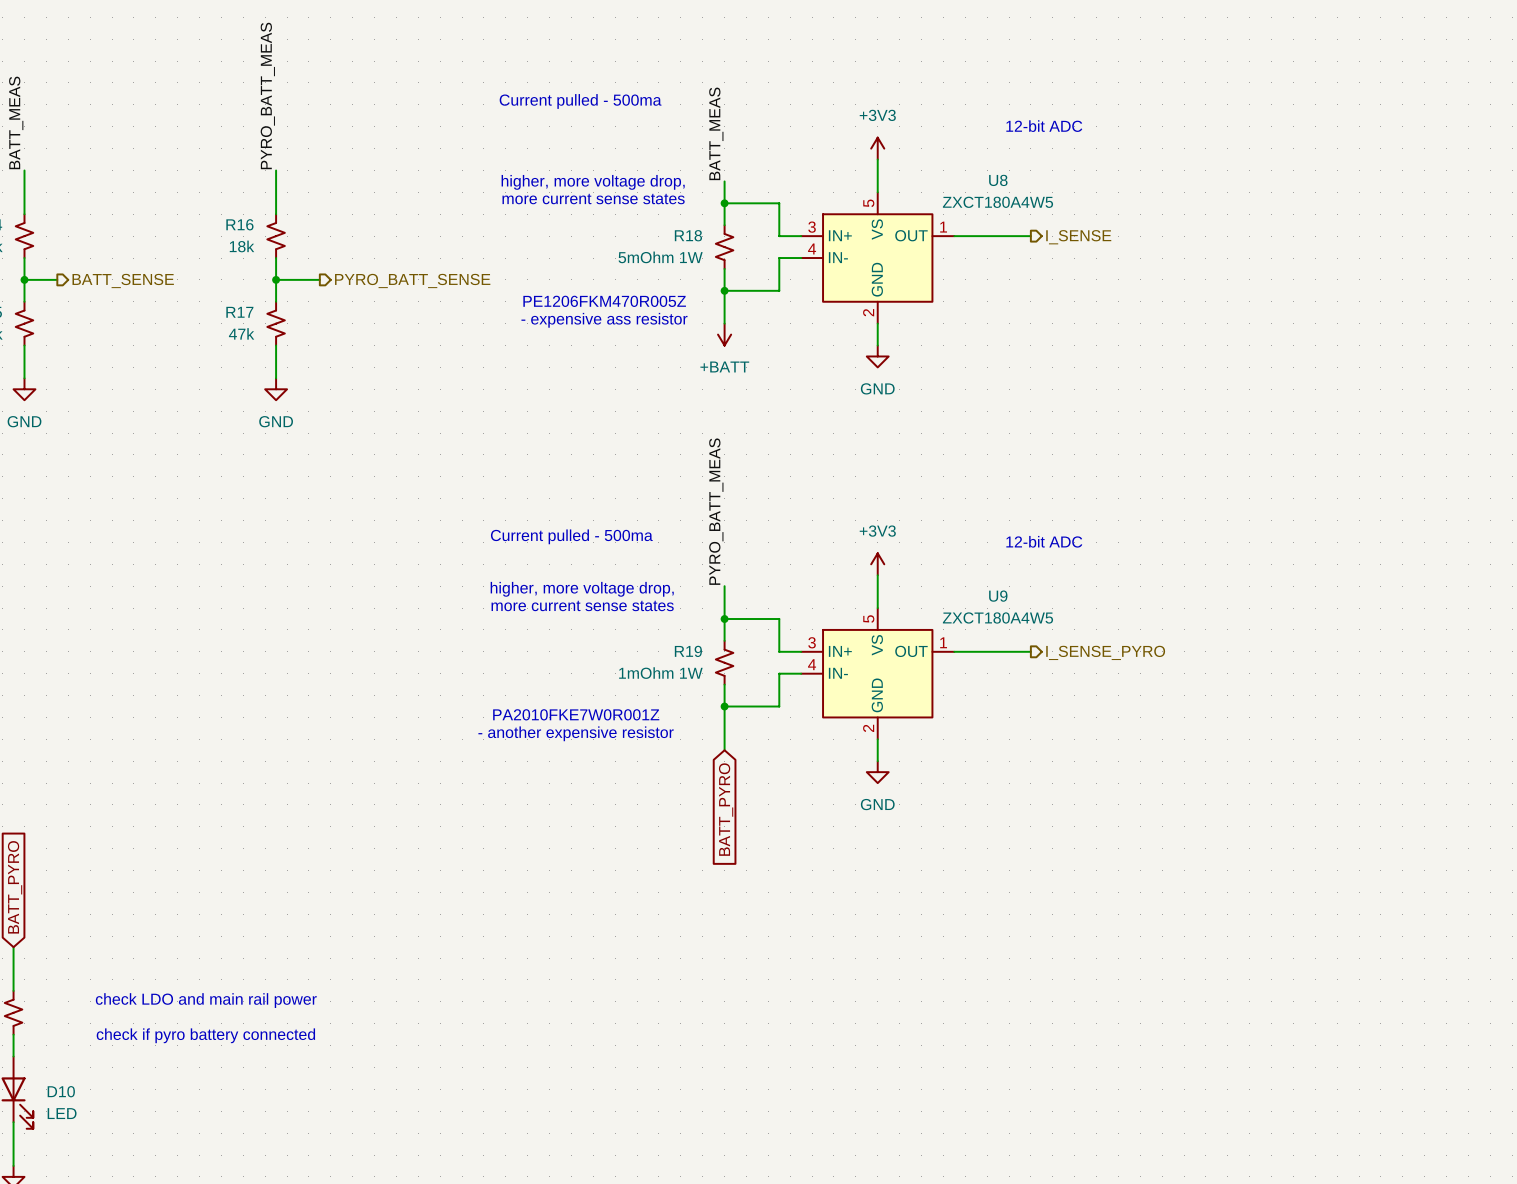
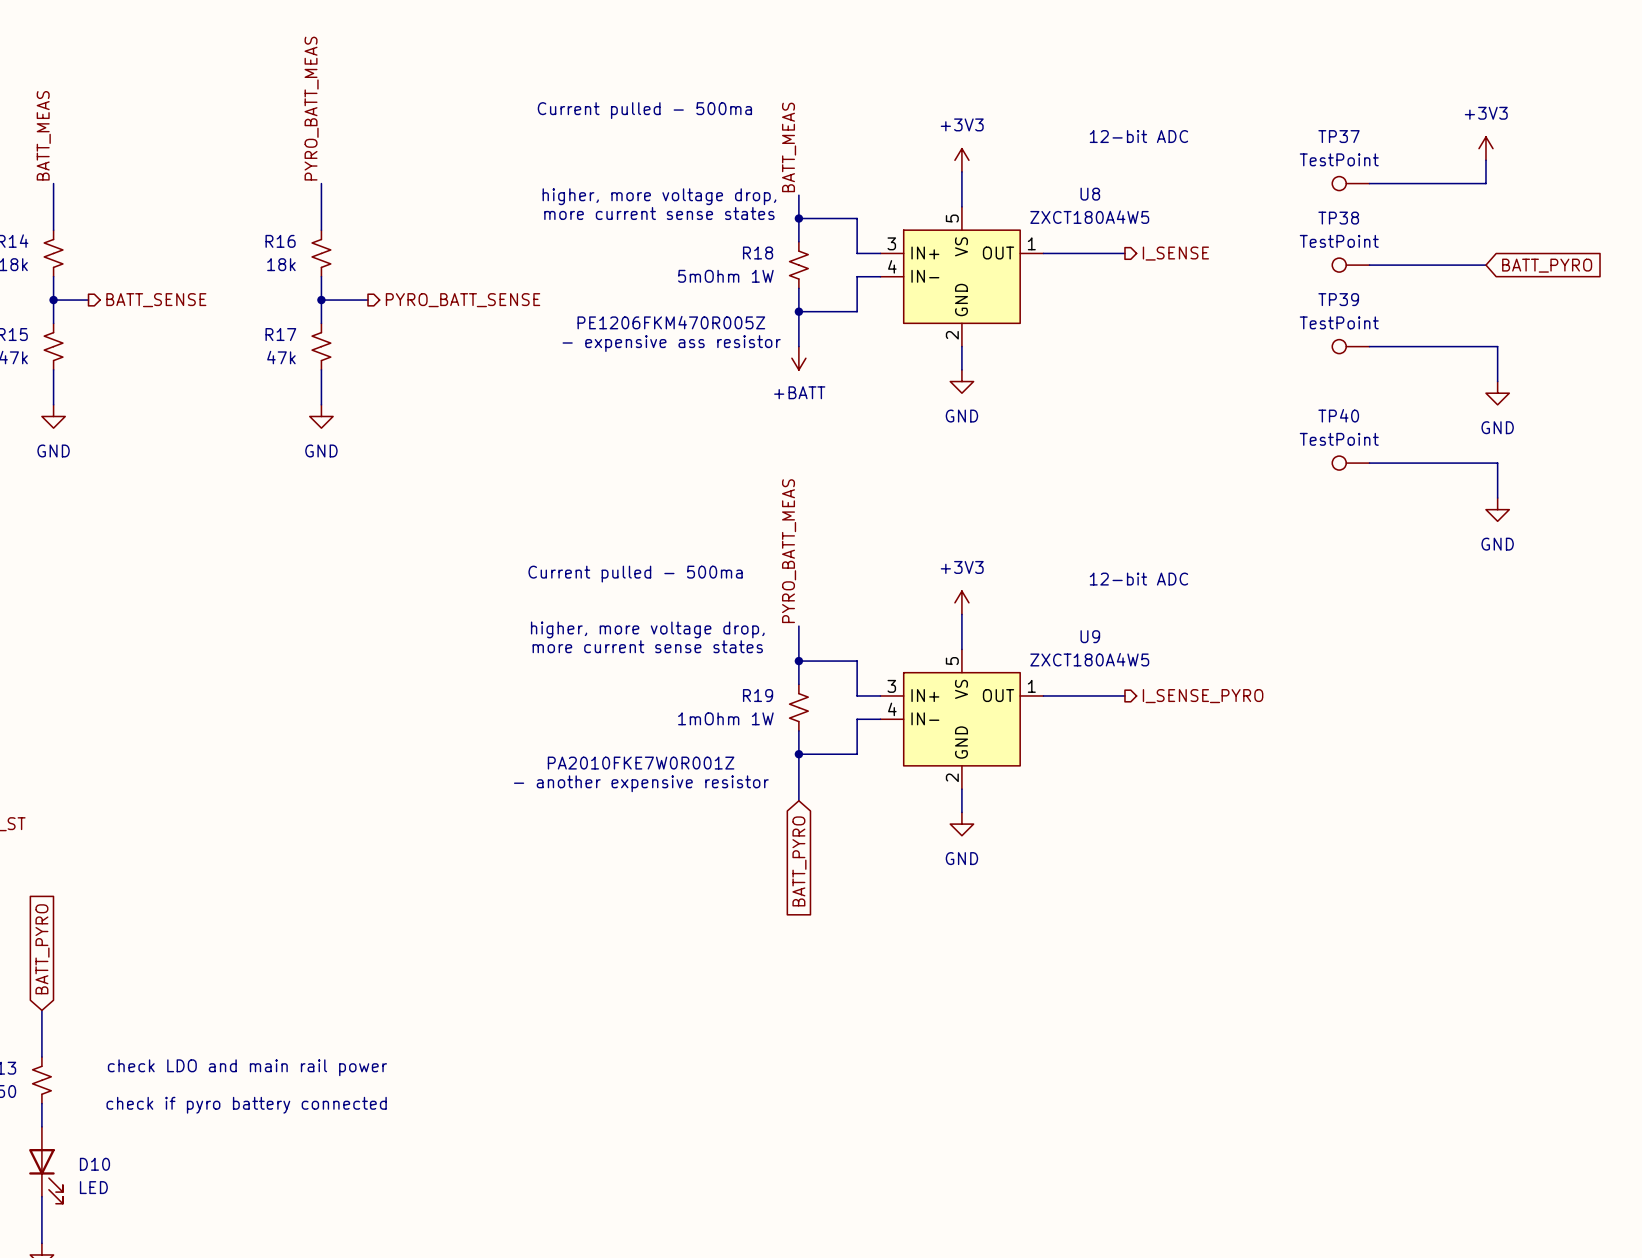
power symbol: none -> +3V3 (1485, 148)
wire: none -> (1485, 160) (1485, 183) (1369, 183)
TP37: none -> TestPoint (1350, 183)
TP38: none -> TestPoint (1350, 265)
wire: none -> (1369, 265) (1485, 265)
global label: none -> BATT_PYRO (1547, 265)
TP39: none -> TestPoint (1350, 346)
wire: none -> (1369, 346) (1497, 346) (1497, 381)
power symbol: none -> GND (1497, 393)
TP40: none -> TestPoint (1350, 463)
wire: none -> (1369, 463) (1497, 463) (1497, 498)
power symbol: none -> GND (1497, 509)

